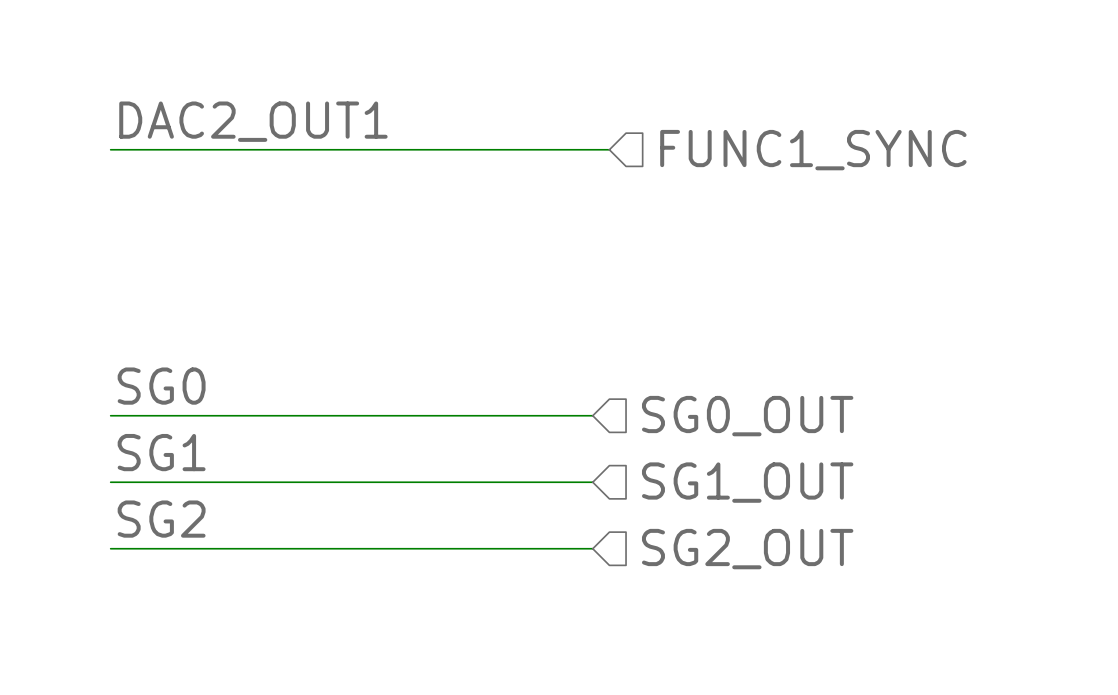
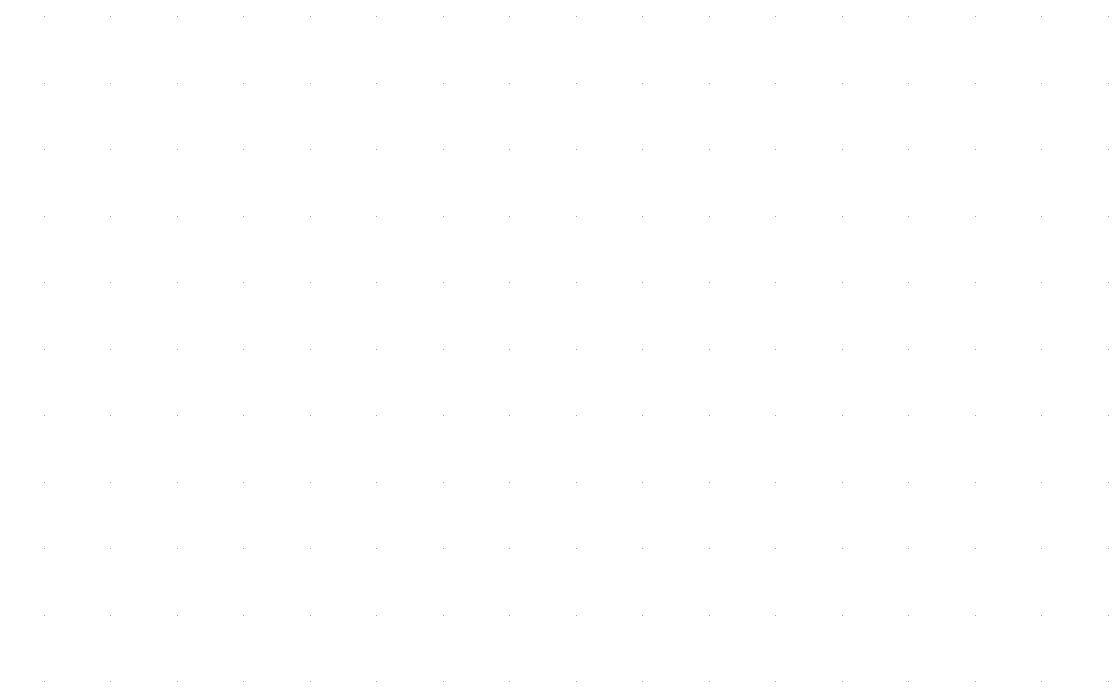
label: DAC2_OUT1 (253, 121) -> none
wire: (110, 149) (609, 149) -> none
hierarchical label: FUNC1_SYNC (813, 150) -> none
label: SG0 (161, 386) -> none
wire: (110, 415) (592, 415) -> none
hierarchical label: SG0_OUT (747, 416) -> none
label: SG1 (161, 452) -> none
wire: (110, 482) (592, 482) -> none
hierarchical label: SG1_OUT (747, 482) -> none
label: SG2 (161, 519) -> none
wire: (110, 548) (592, 548) -> none
hierarchical label: SG2_OUT (747, 549) -> none

